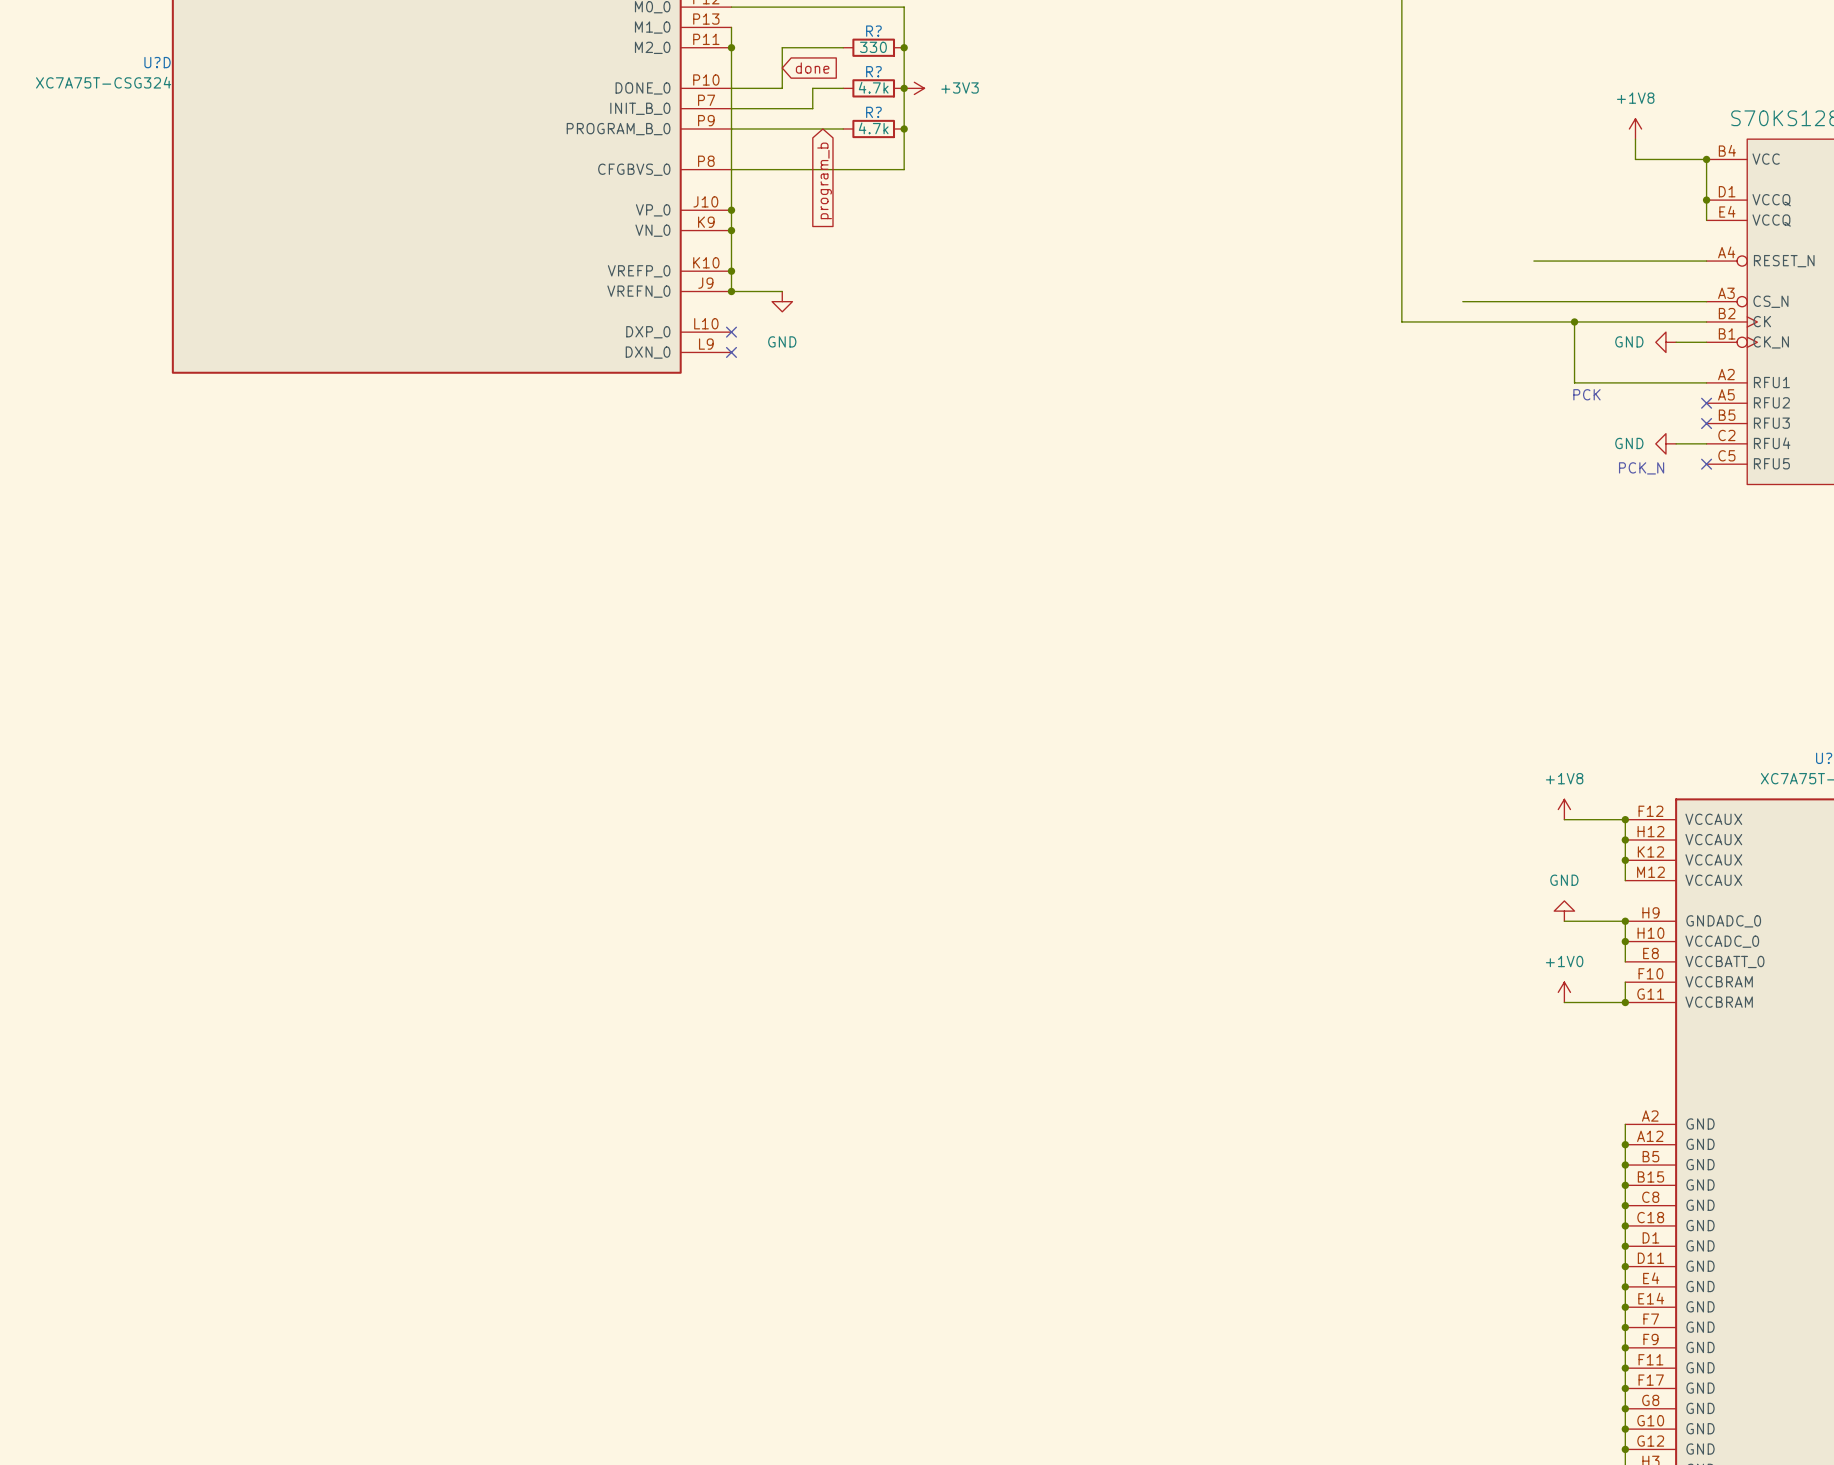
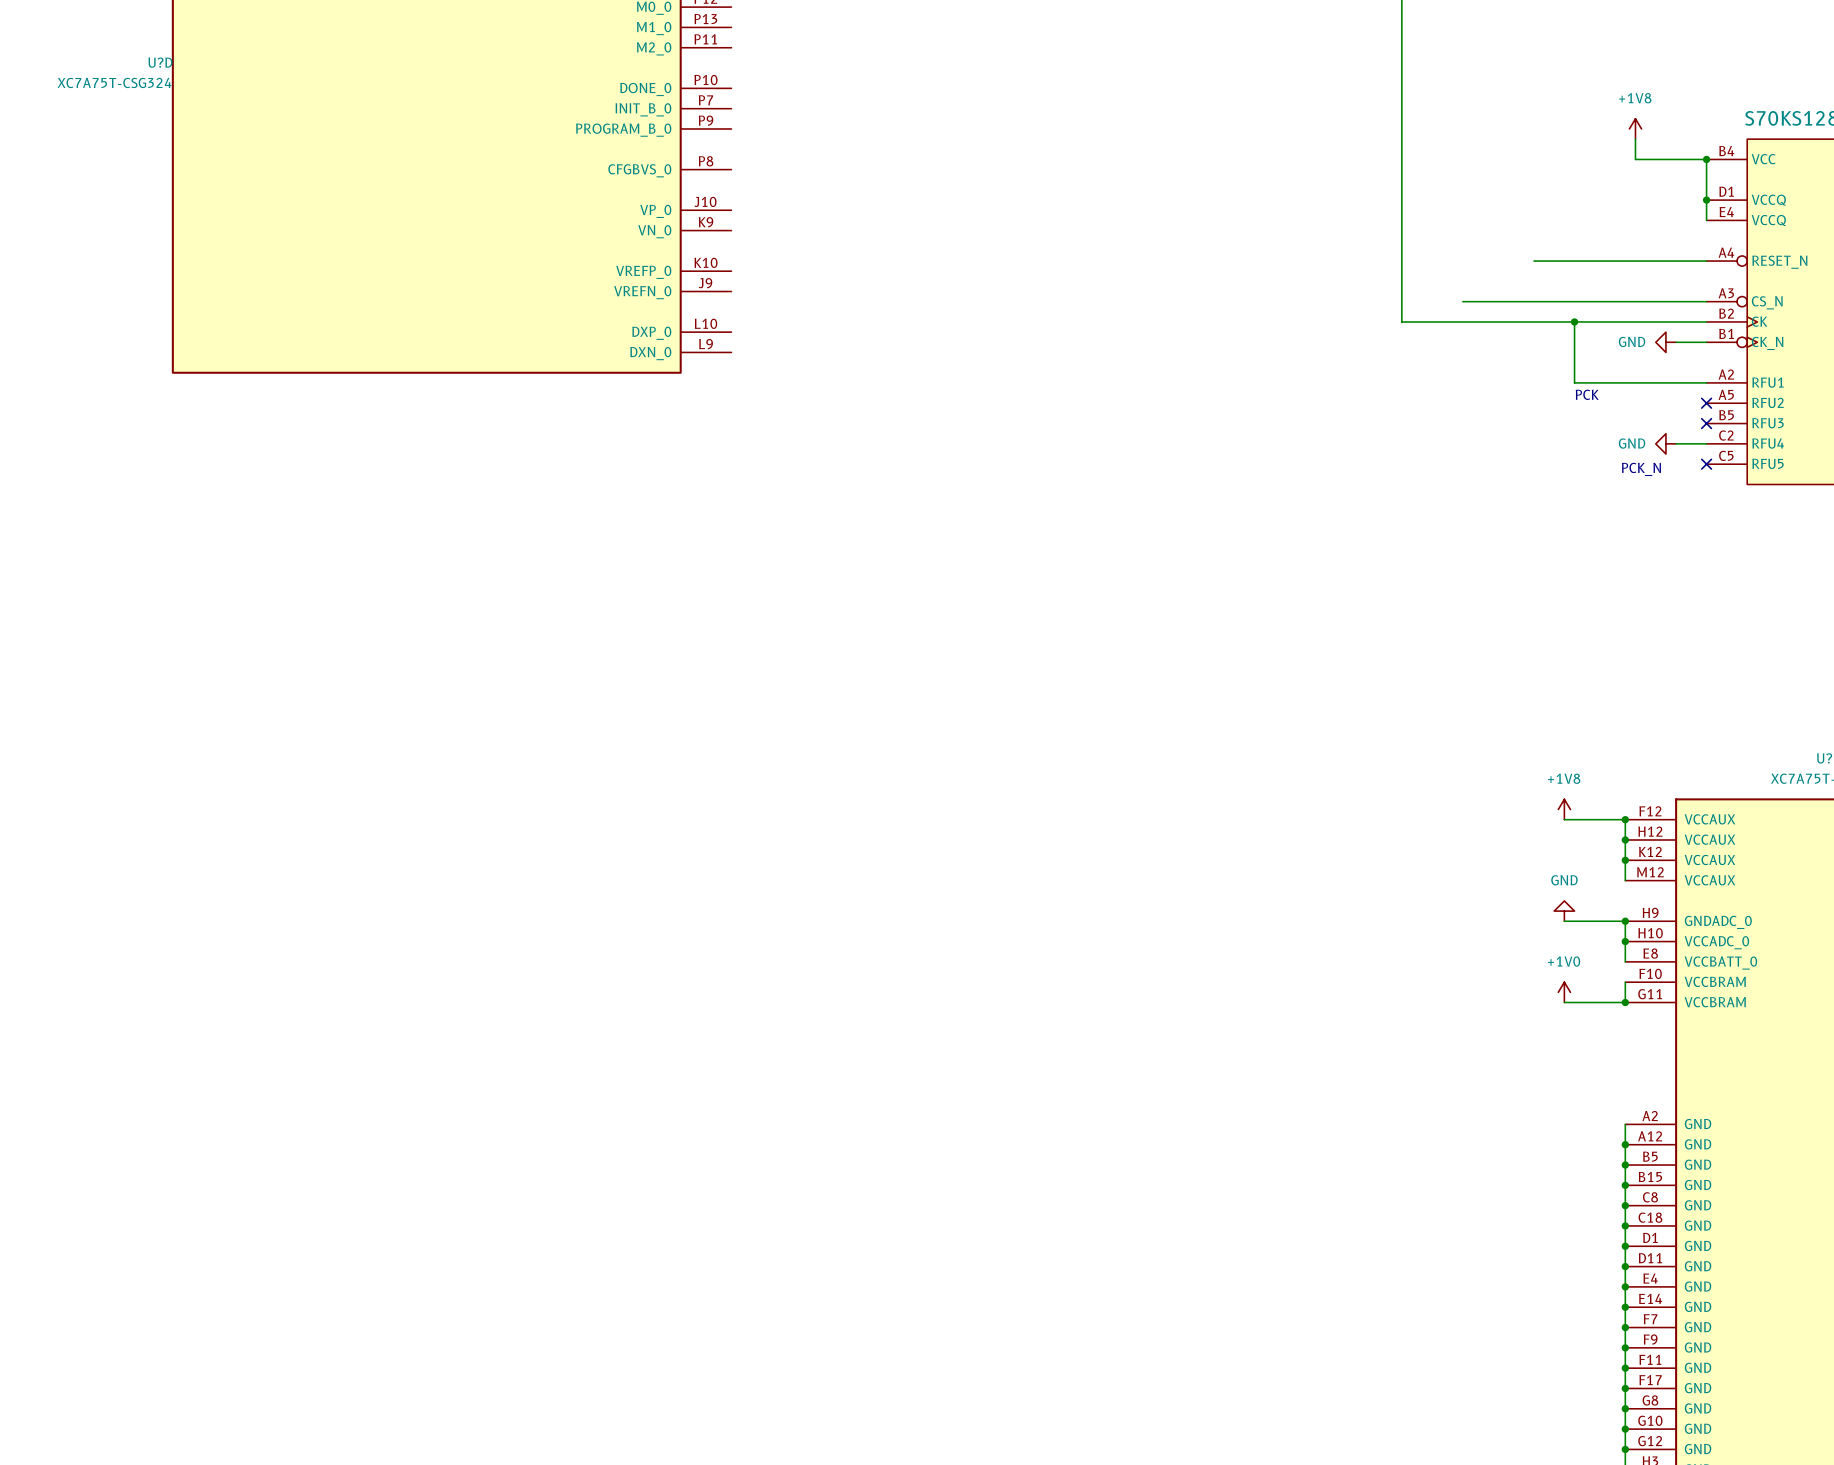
wire: (731, 7) (904, 7) (904, 169) (731, 169) -> none
wire: (731, 27) (731, 291) (782, 291) -> none
junction: (731, 47) -> none
wire: (843, 47) (782, 47) (782, 88) (731, 88) -> none
R?: 330 (873, 47) -> none
junction: (904, 47) -> none
global label: done (812, 68) -> none
wire: (843, 88) (812, 88) (812, 108) (731, 108) -> none
R?: 4.7k (873, 88) -> none
junction: (904, 88) -> none
power symbol: +3V3 (914, 88) -> none
wire: (731, 128) (843, 128) -> none
R?: 4.7k (873, 128) -> none
junction: (904, 128) -> none
global label: program_b (824, 180) -> none
junction: (731, 210) -> none
junction: (731, 230) -> none
junction: (731, 271) -> none
junction: (731, 291) -> none
power symbol: GND (782, 301) -> none
no-connect mark: (731, 332) -> none
no-connect mark: (731, 352) -> none

